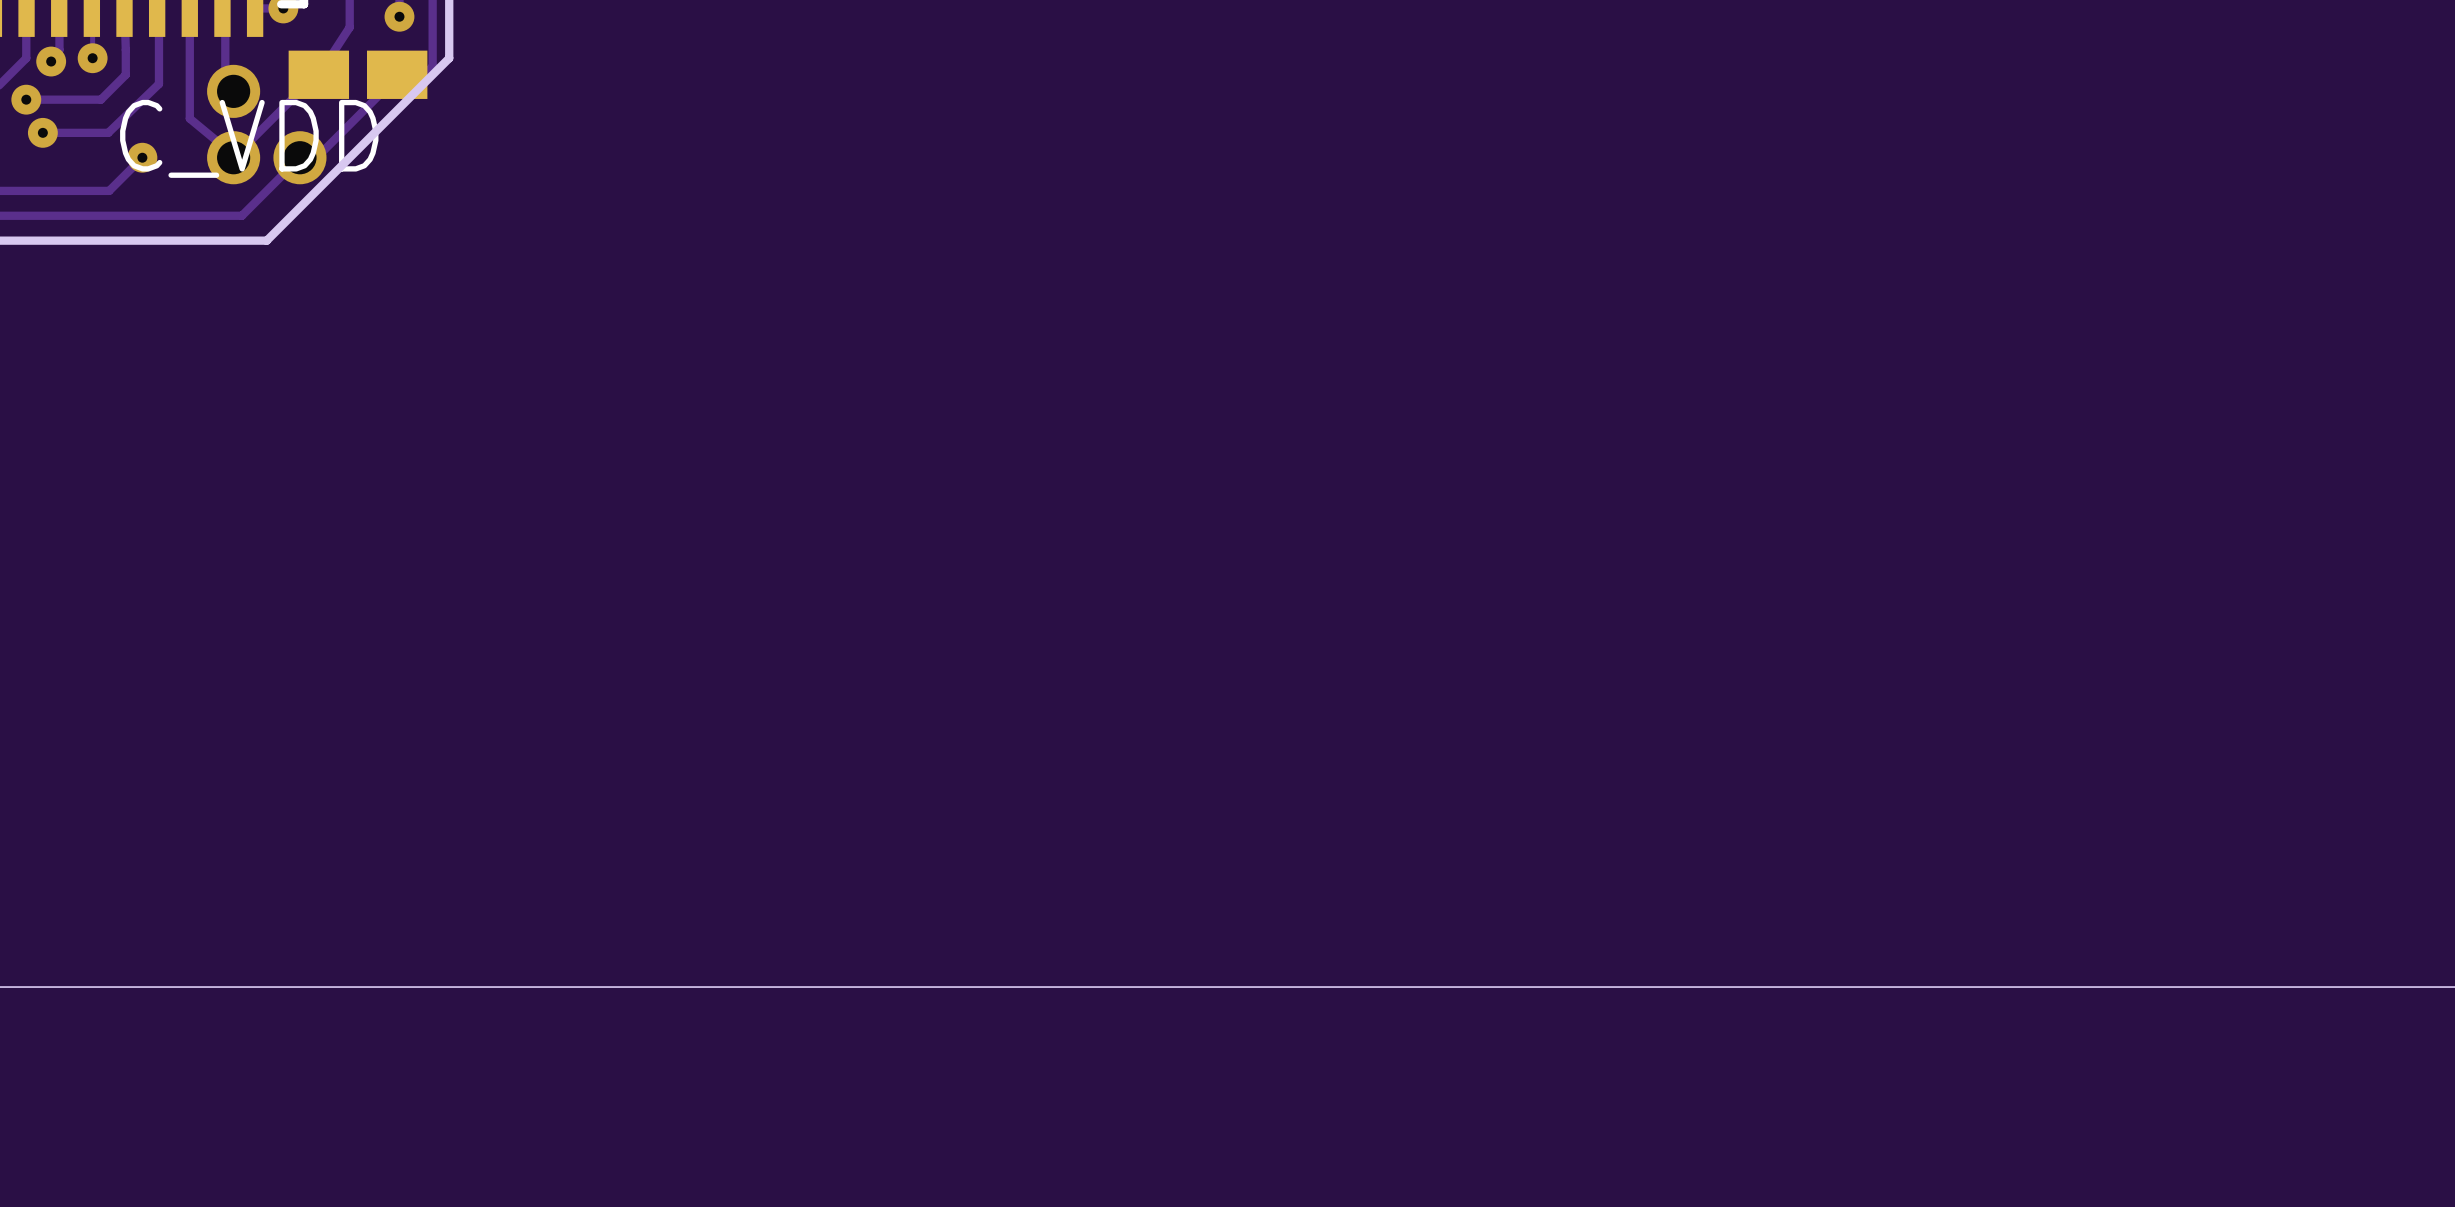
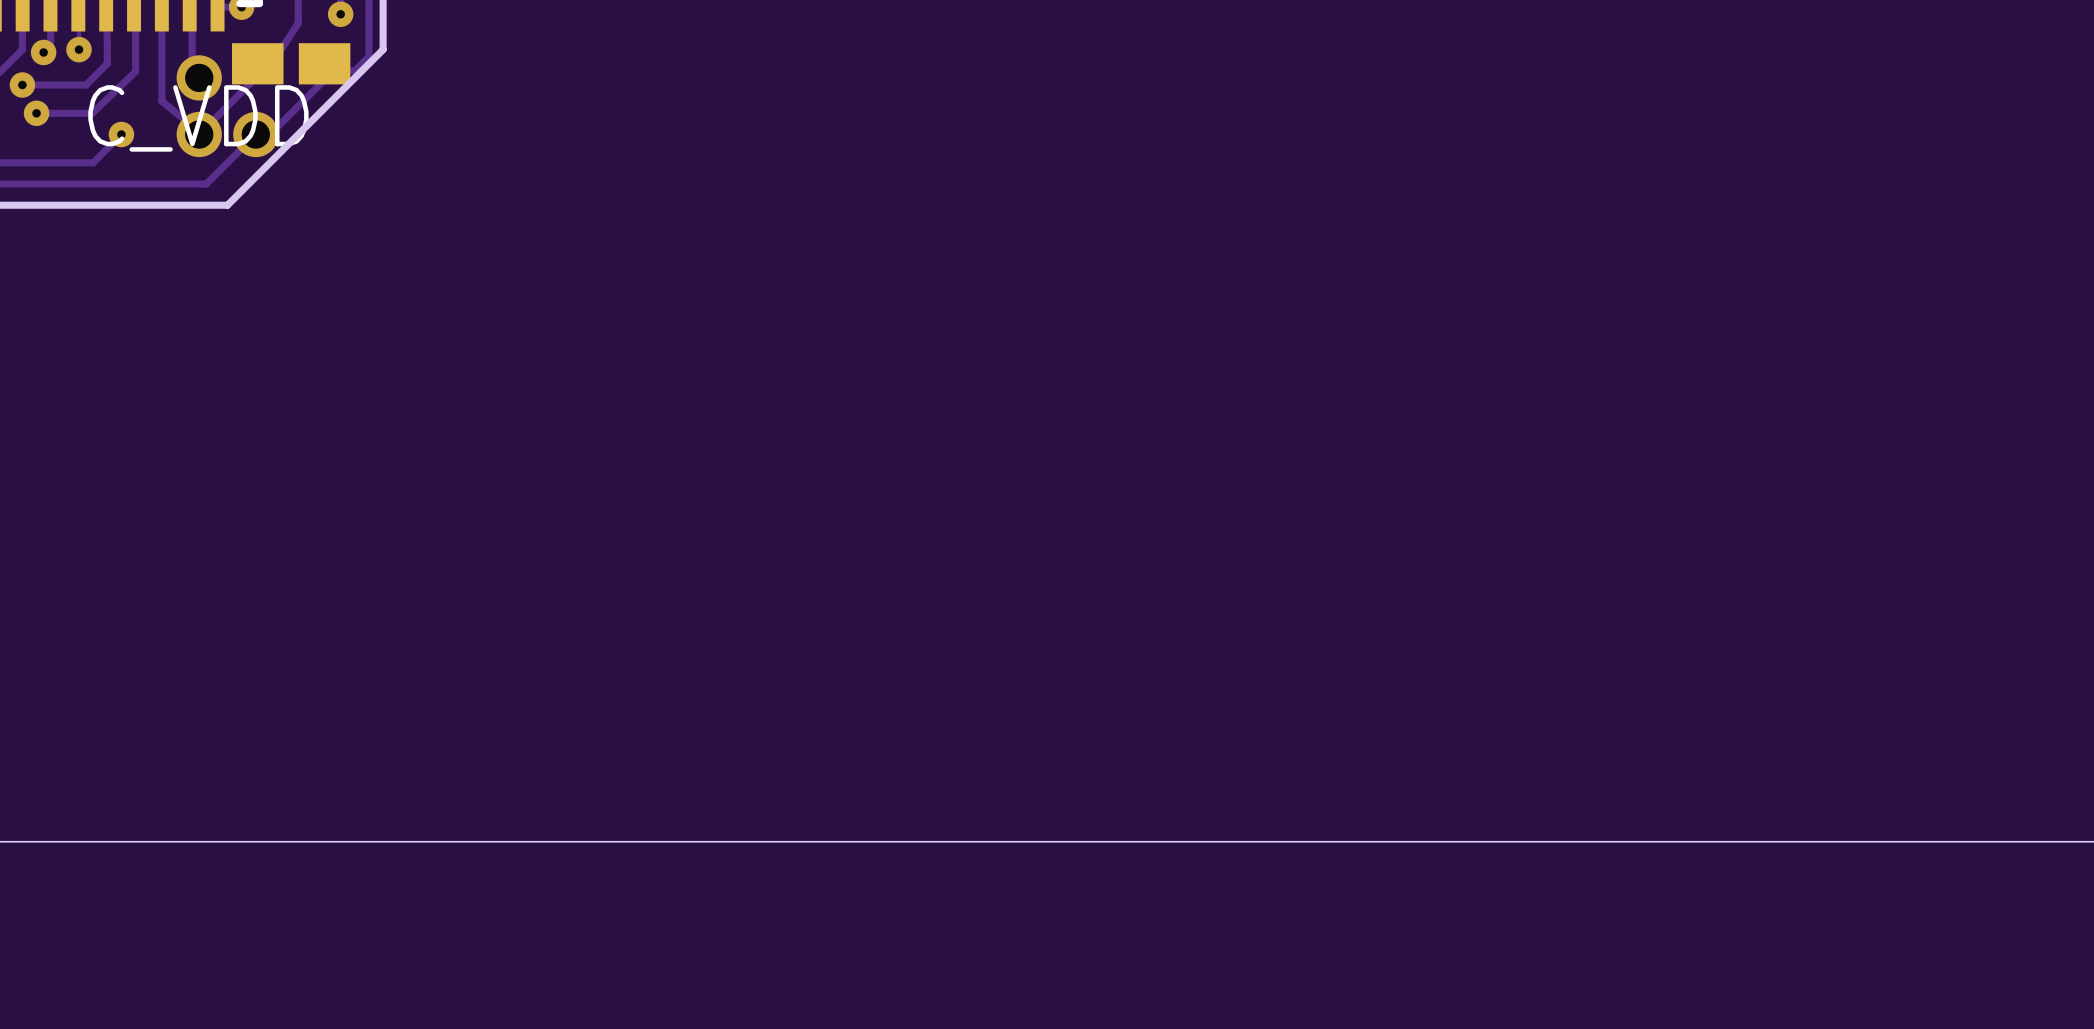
C_VDD position: (358, 74) -> (291, 63)

